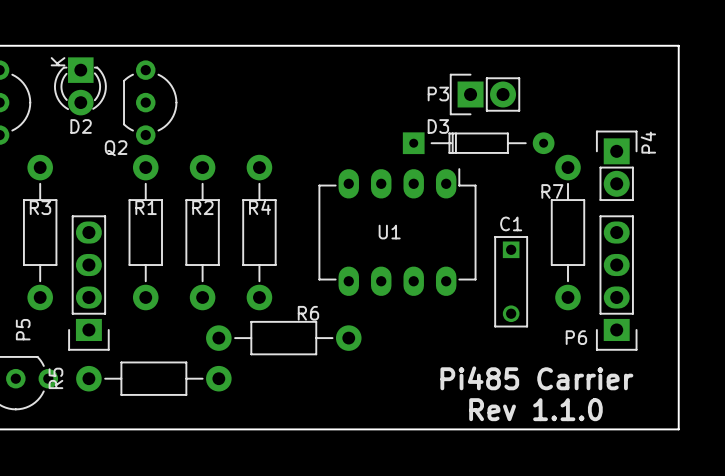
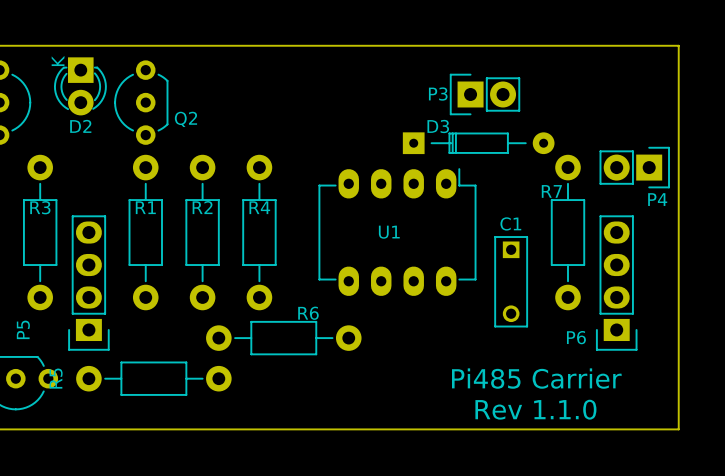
Q2 rotation: 0° (150, 102) -> 180° (141, 102)
Q2 name position: Q2 (116, 148) -> Q2 (185, 119)
P4 rotation: 0° (616, 165) -> 90° clockwise (634, 167)

